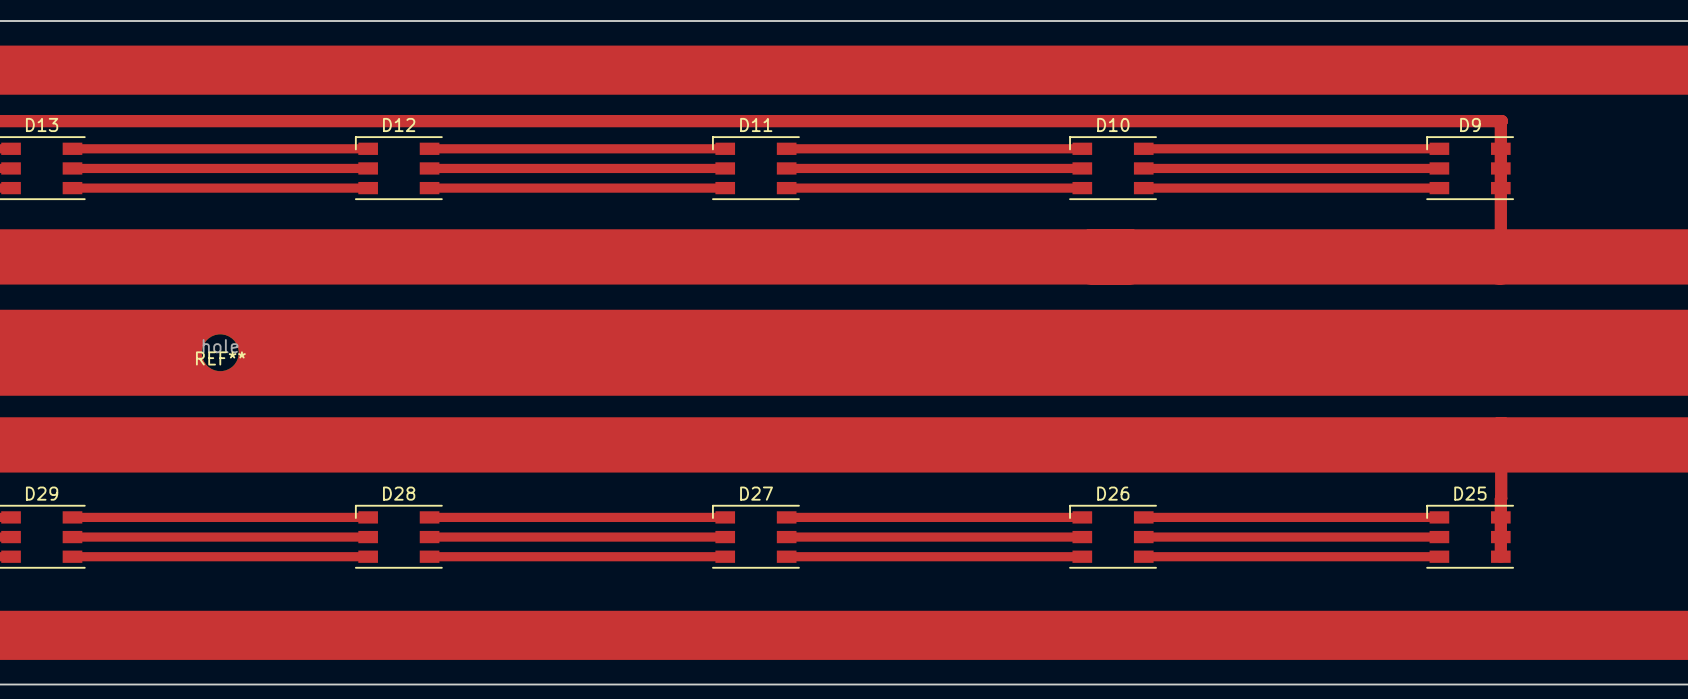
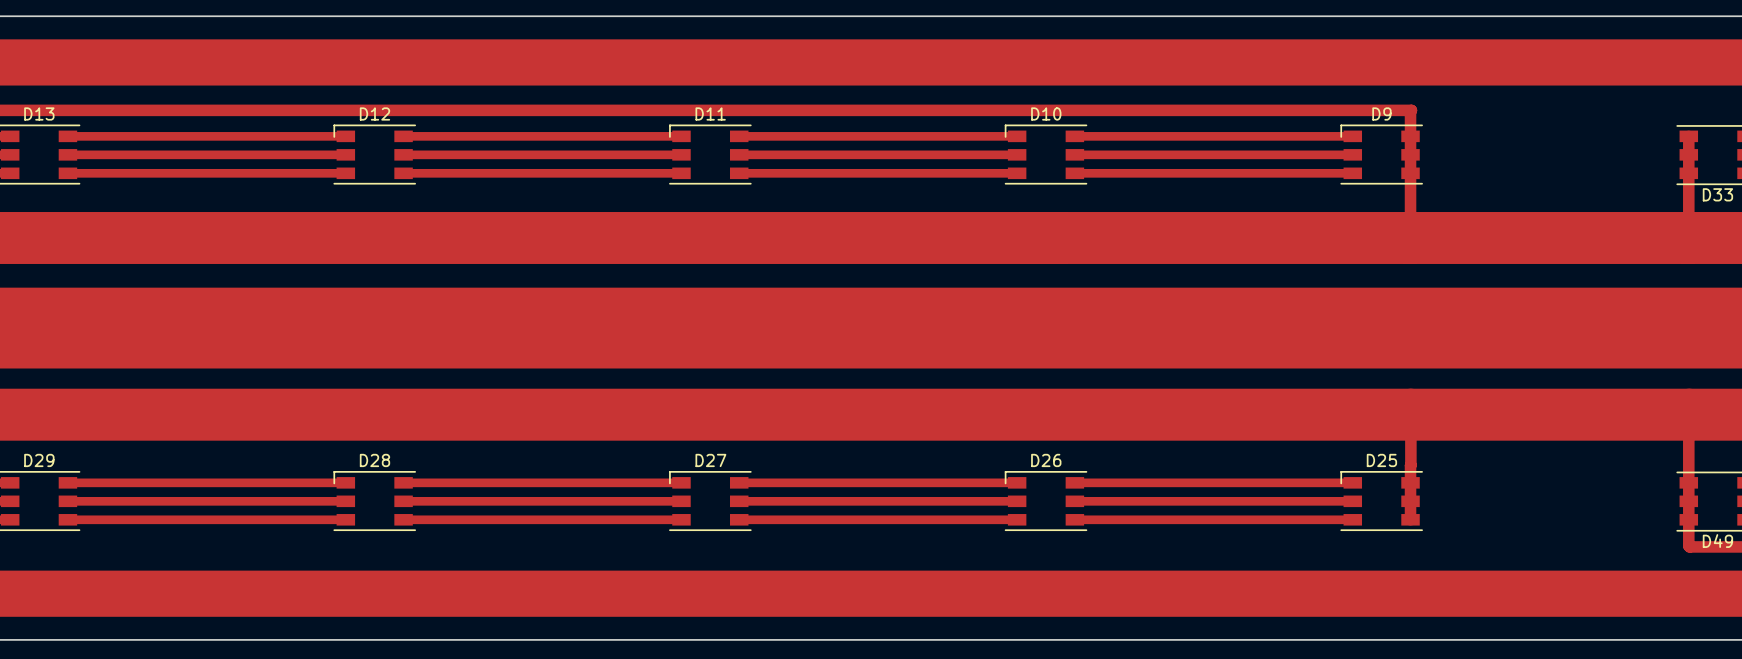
REF**: hole (220, 352) -> none

